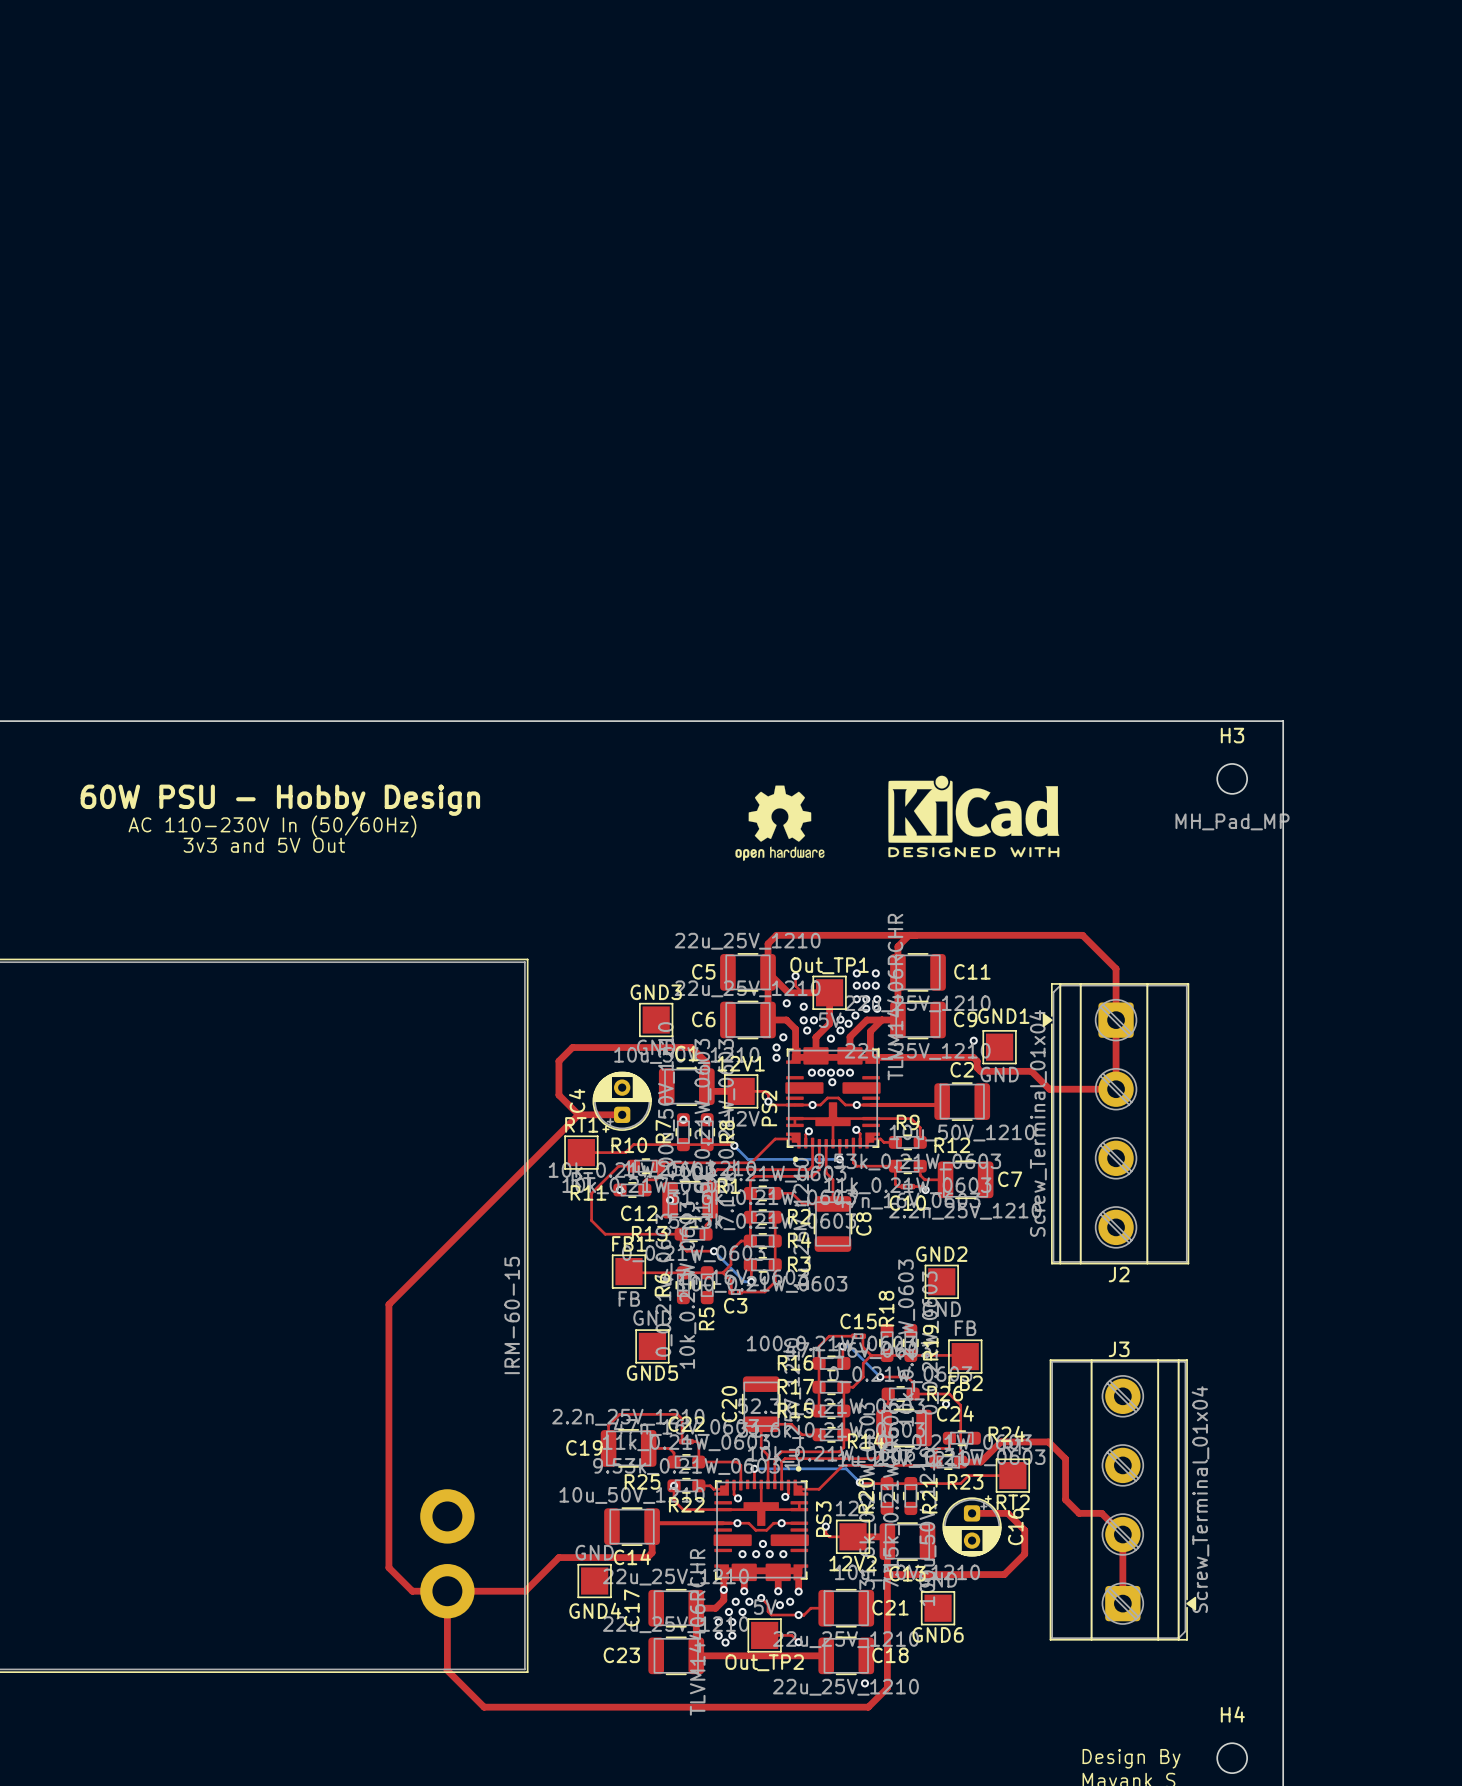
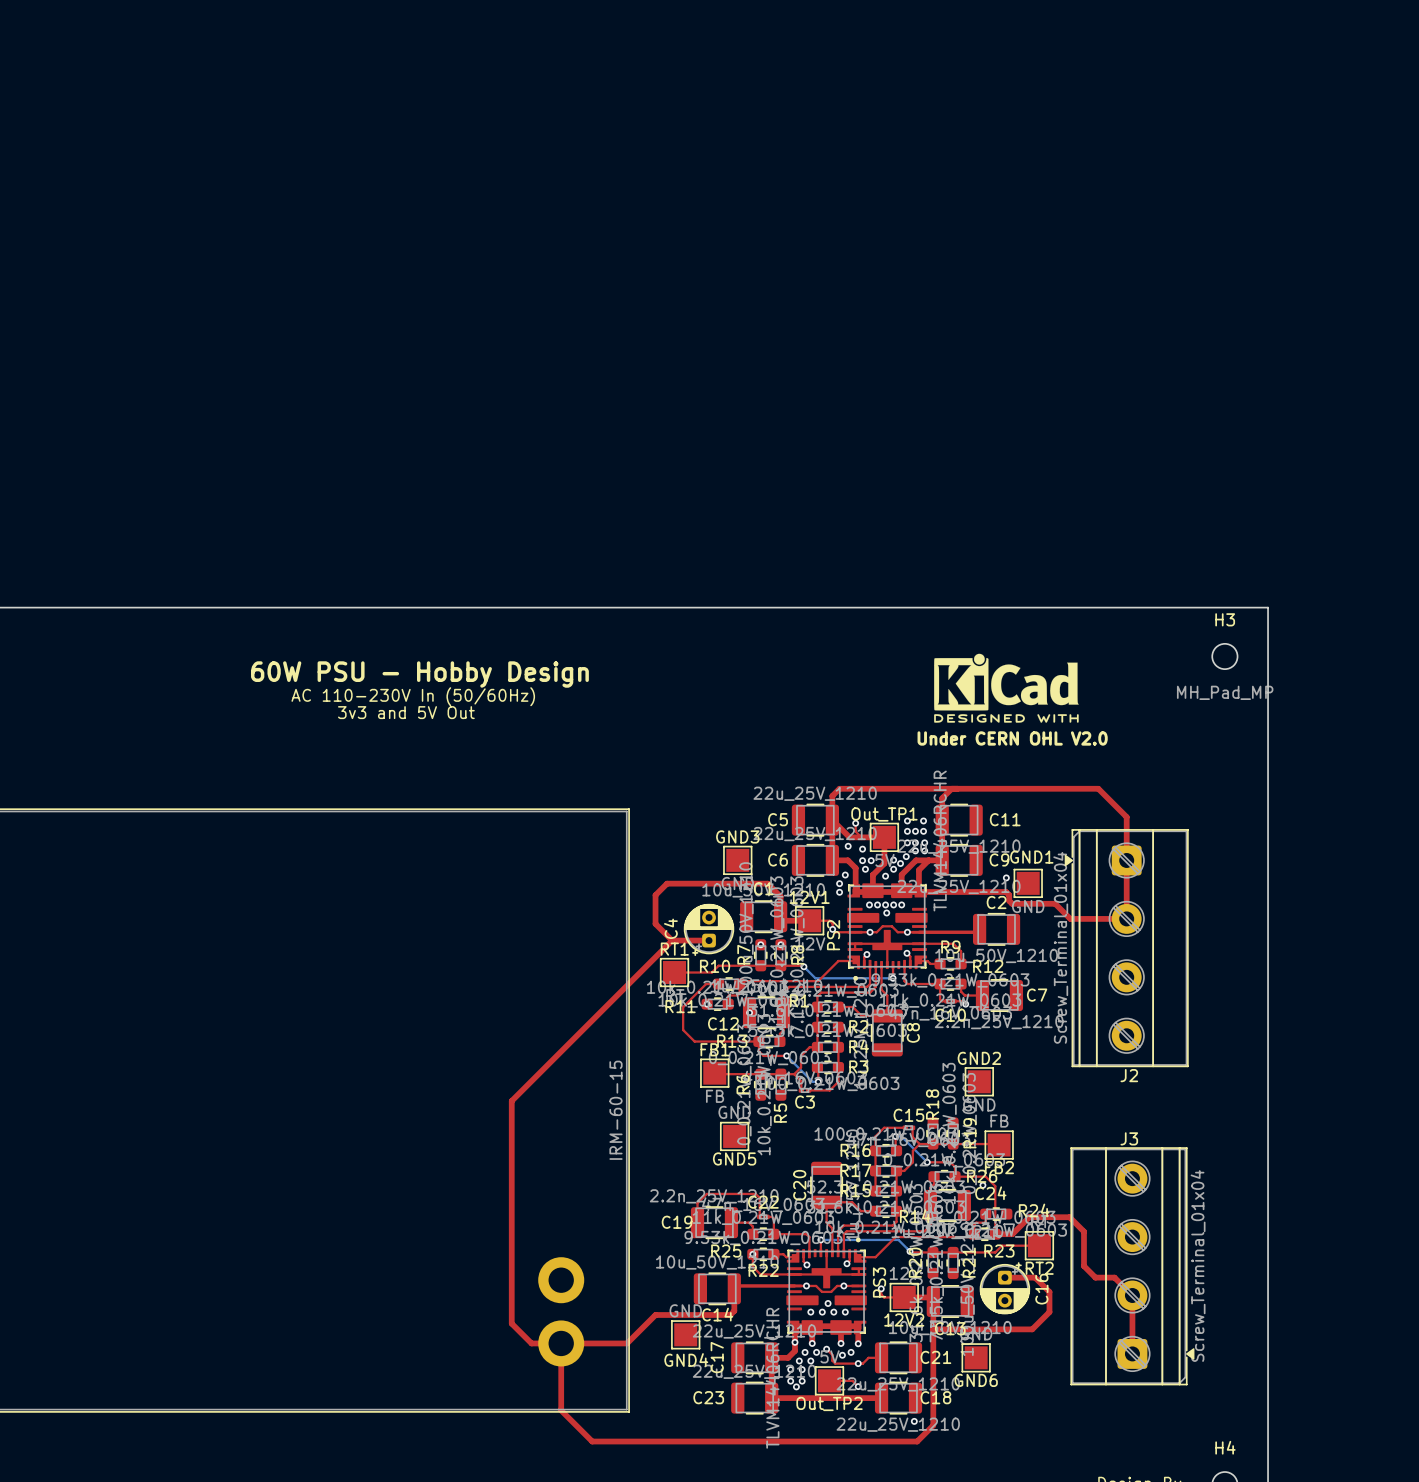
drawing: [735, 785, 825, 861] -> none
text: none -> Under CERN OHL V2.0 (1012, 738)

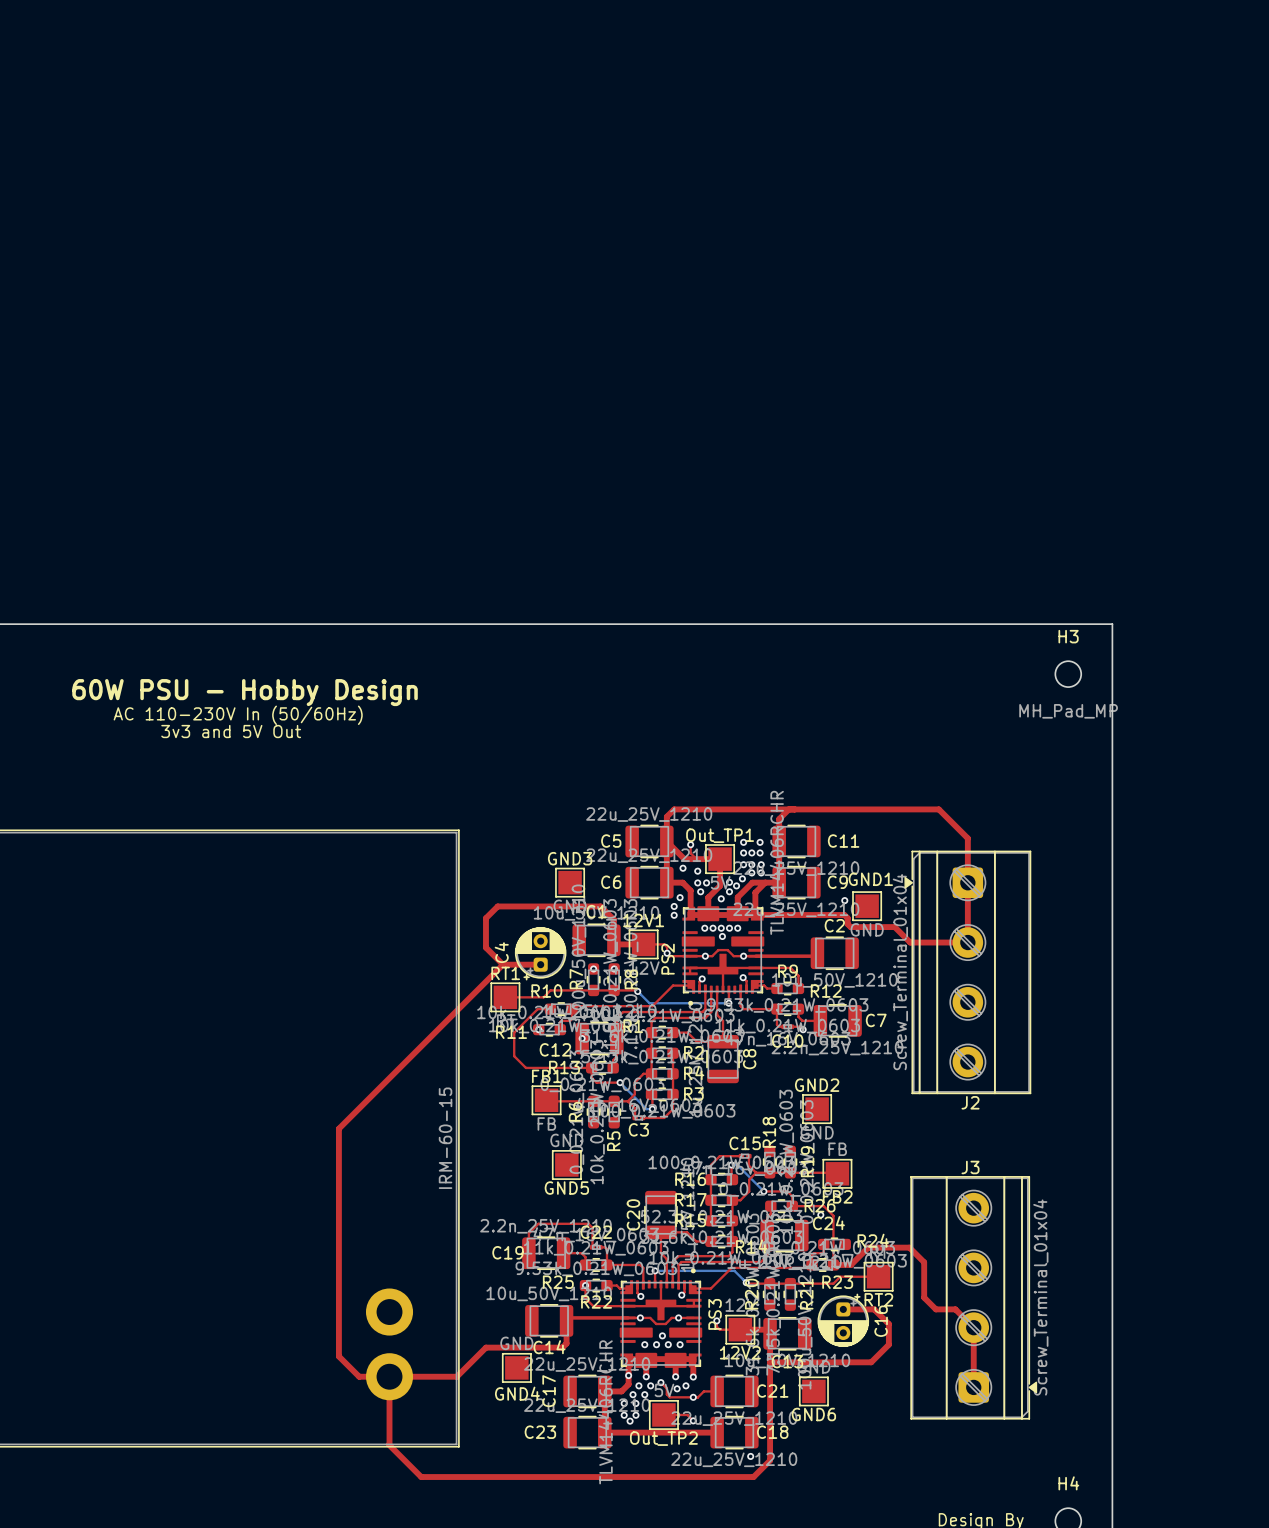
drawing: [934, 653, 1079, 723] -> none
text: Under CERN OHL V2.0 (1012, 738) -> none

